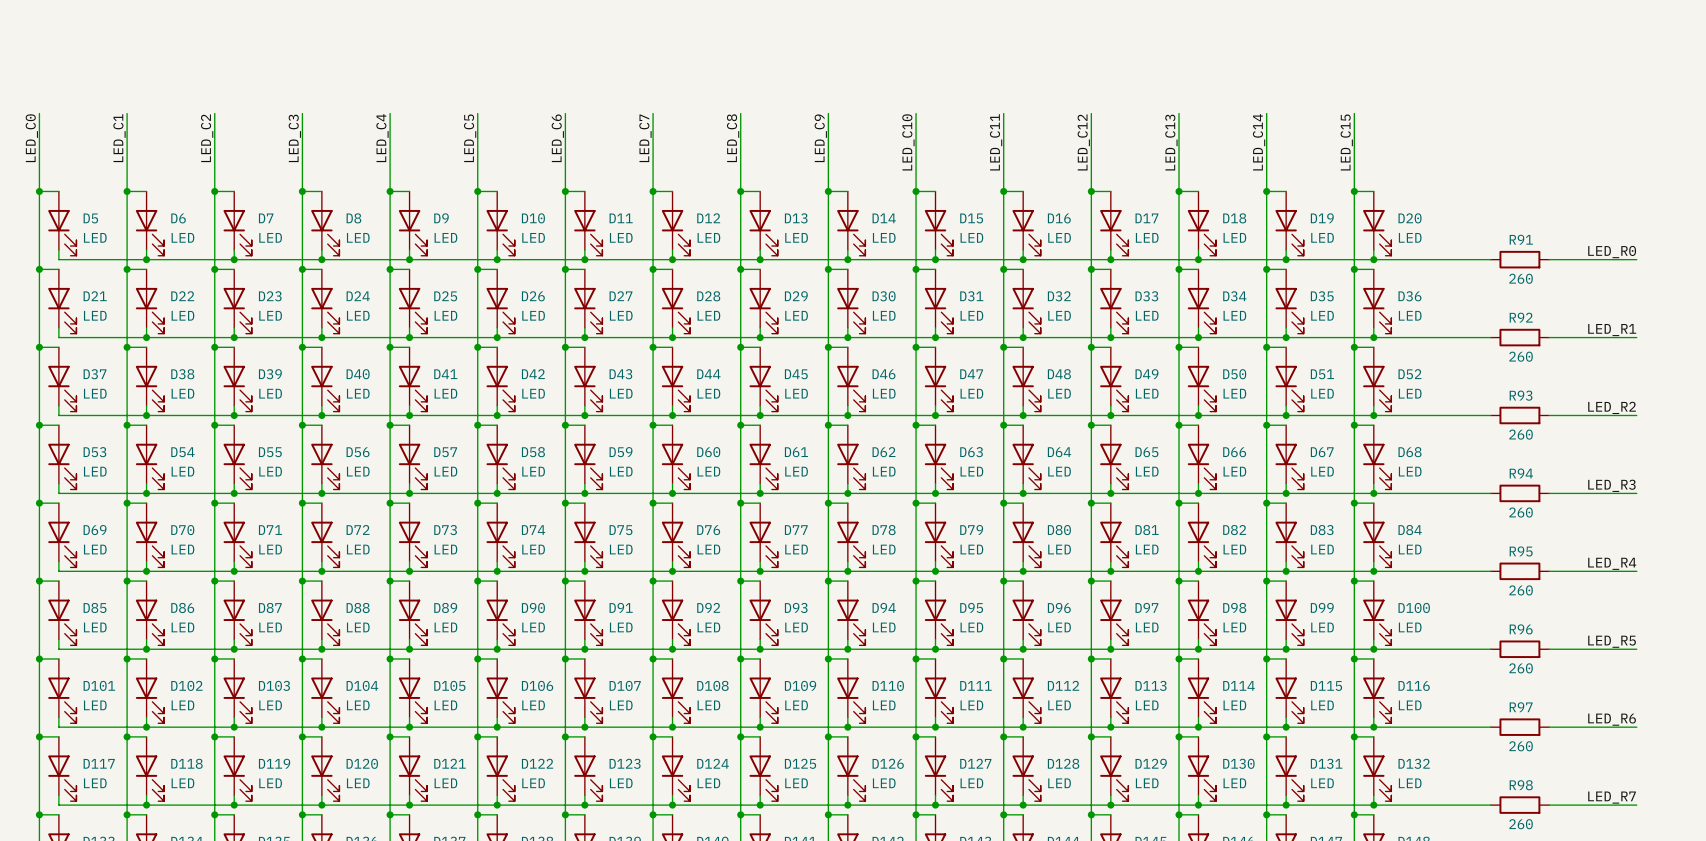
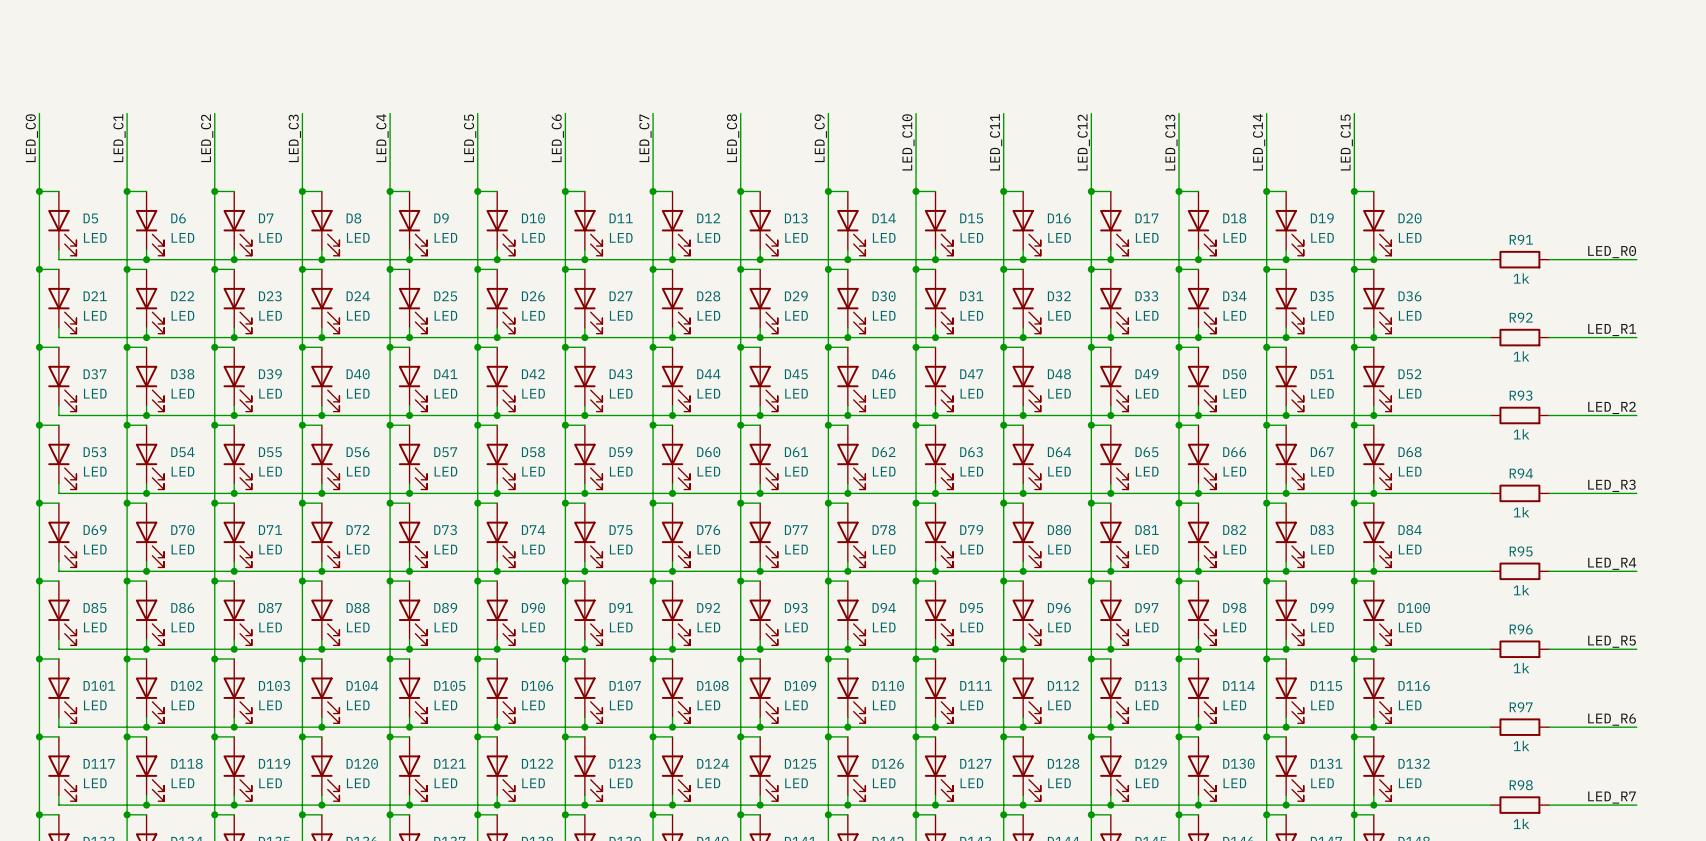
R91 value: 260 (1521, 278) -> 1k (1521, 278)
R92 value: 260 (1521, 356) -> 1k (1521, 356)
R93 value: 260 (1521, 434) -> 1k (1521, 434)
R94 value: 260 (1521, 512) -> 1k (1521, 512)
R95 value: 260 (1521, 590) -> 1k (1521, 590)
R96 value: 260 (1521, 668) -> 1k (1521, 668)
R97 value: 260 (1521, 746) -> 1k (1521, 745)
R98 value: 260 (1521, 824) -> 1k (1521, 823)

